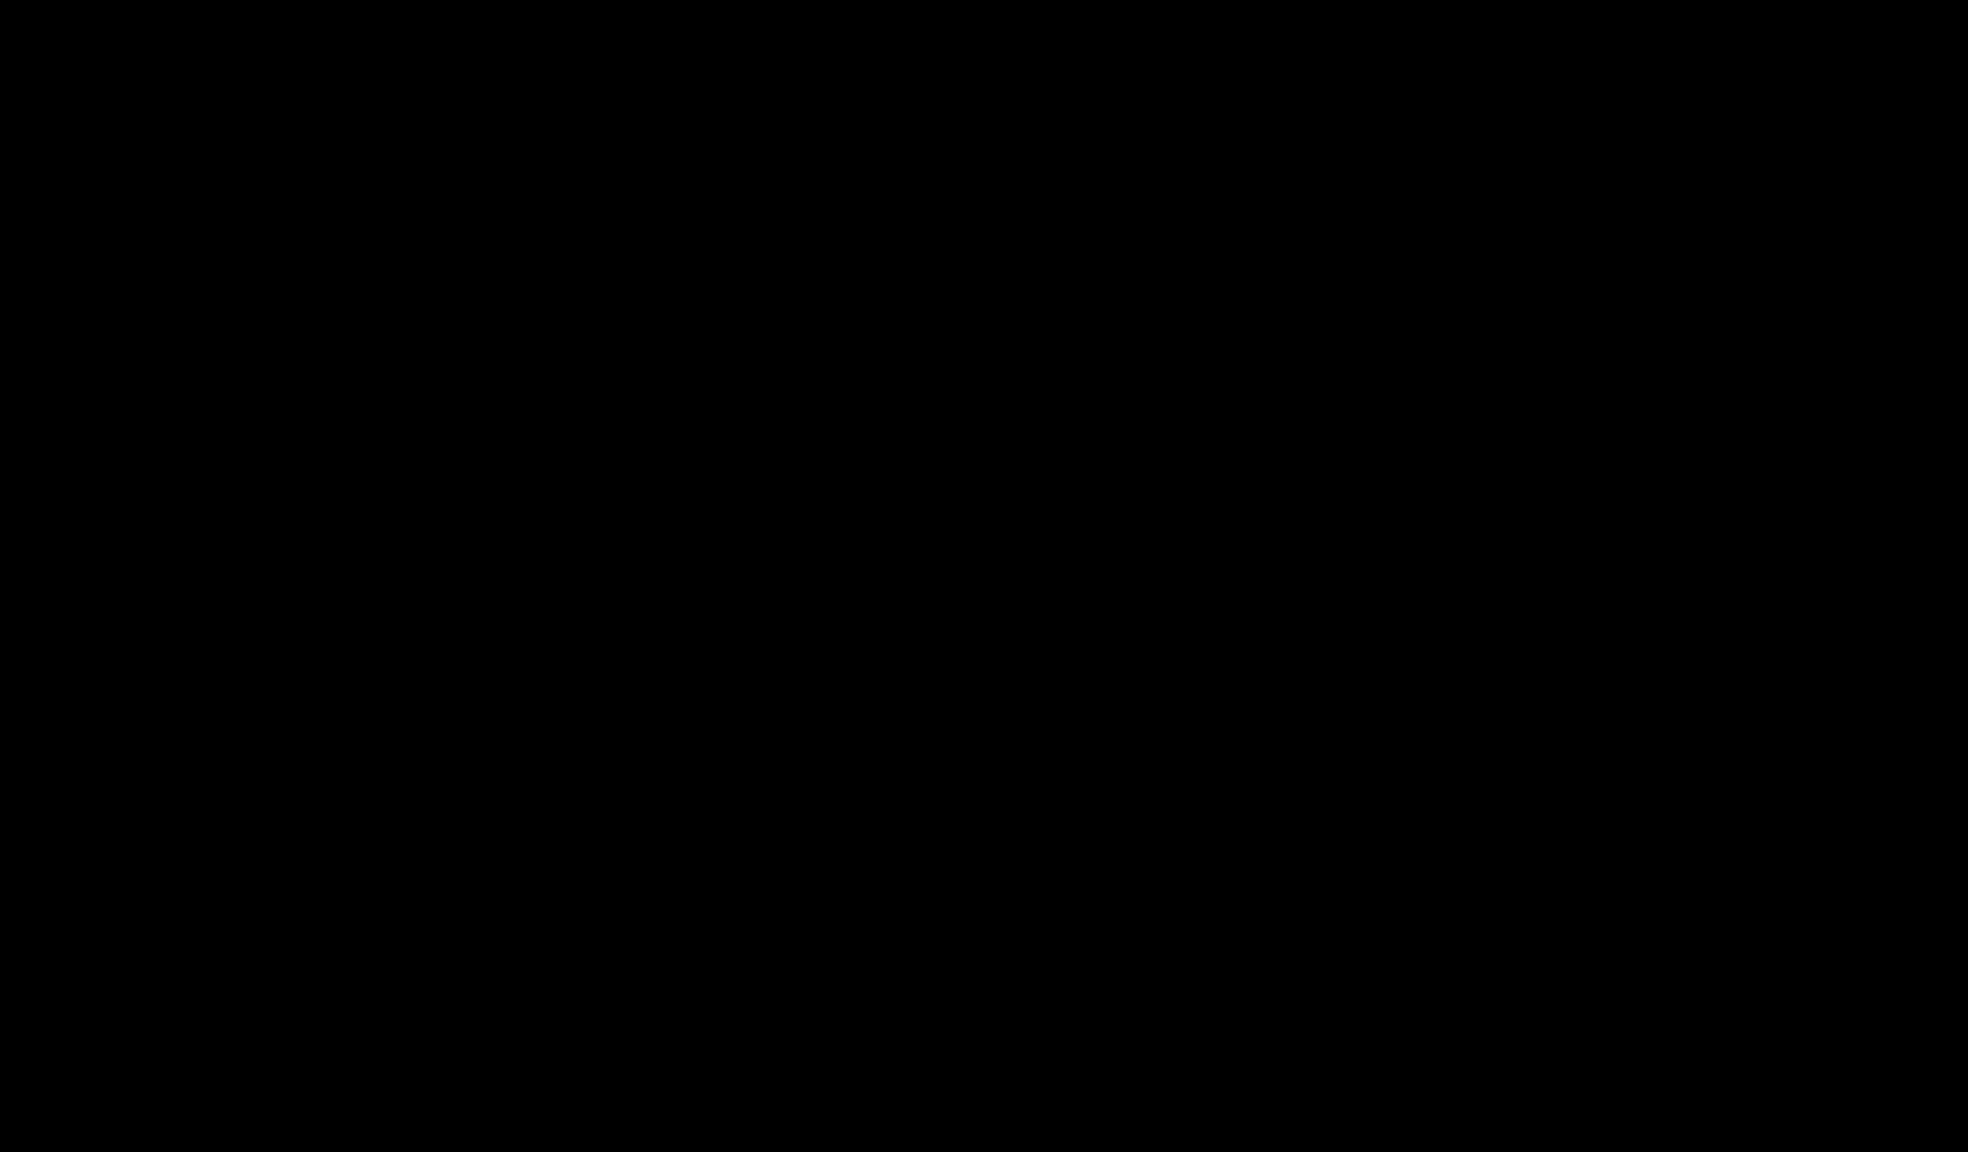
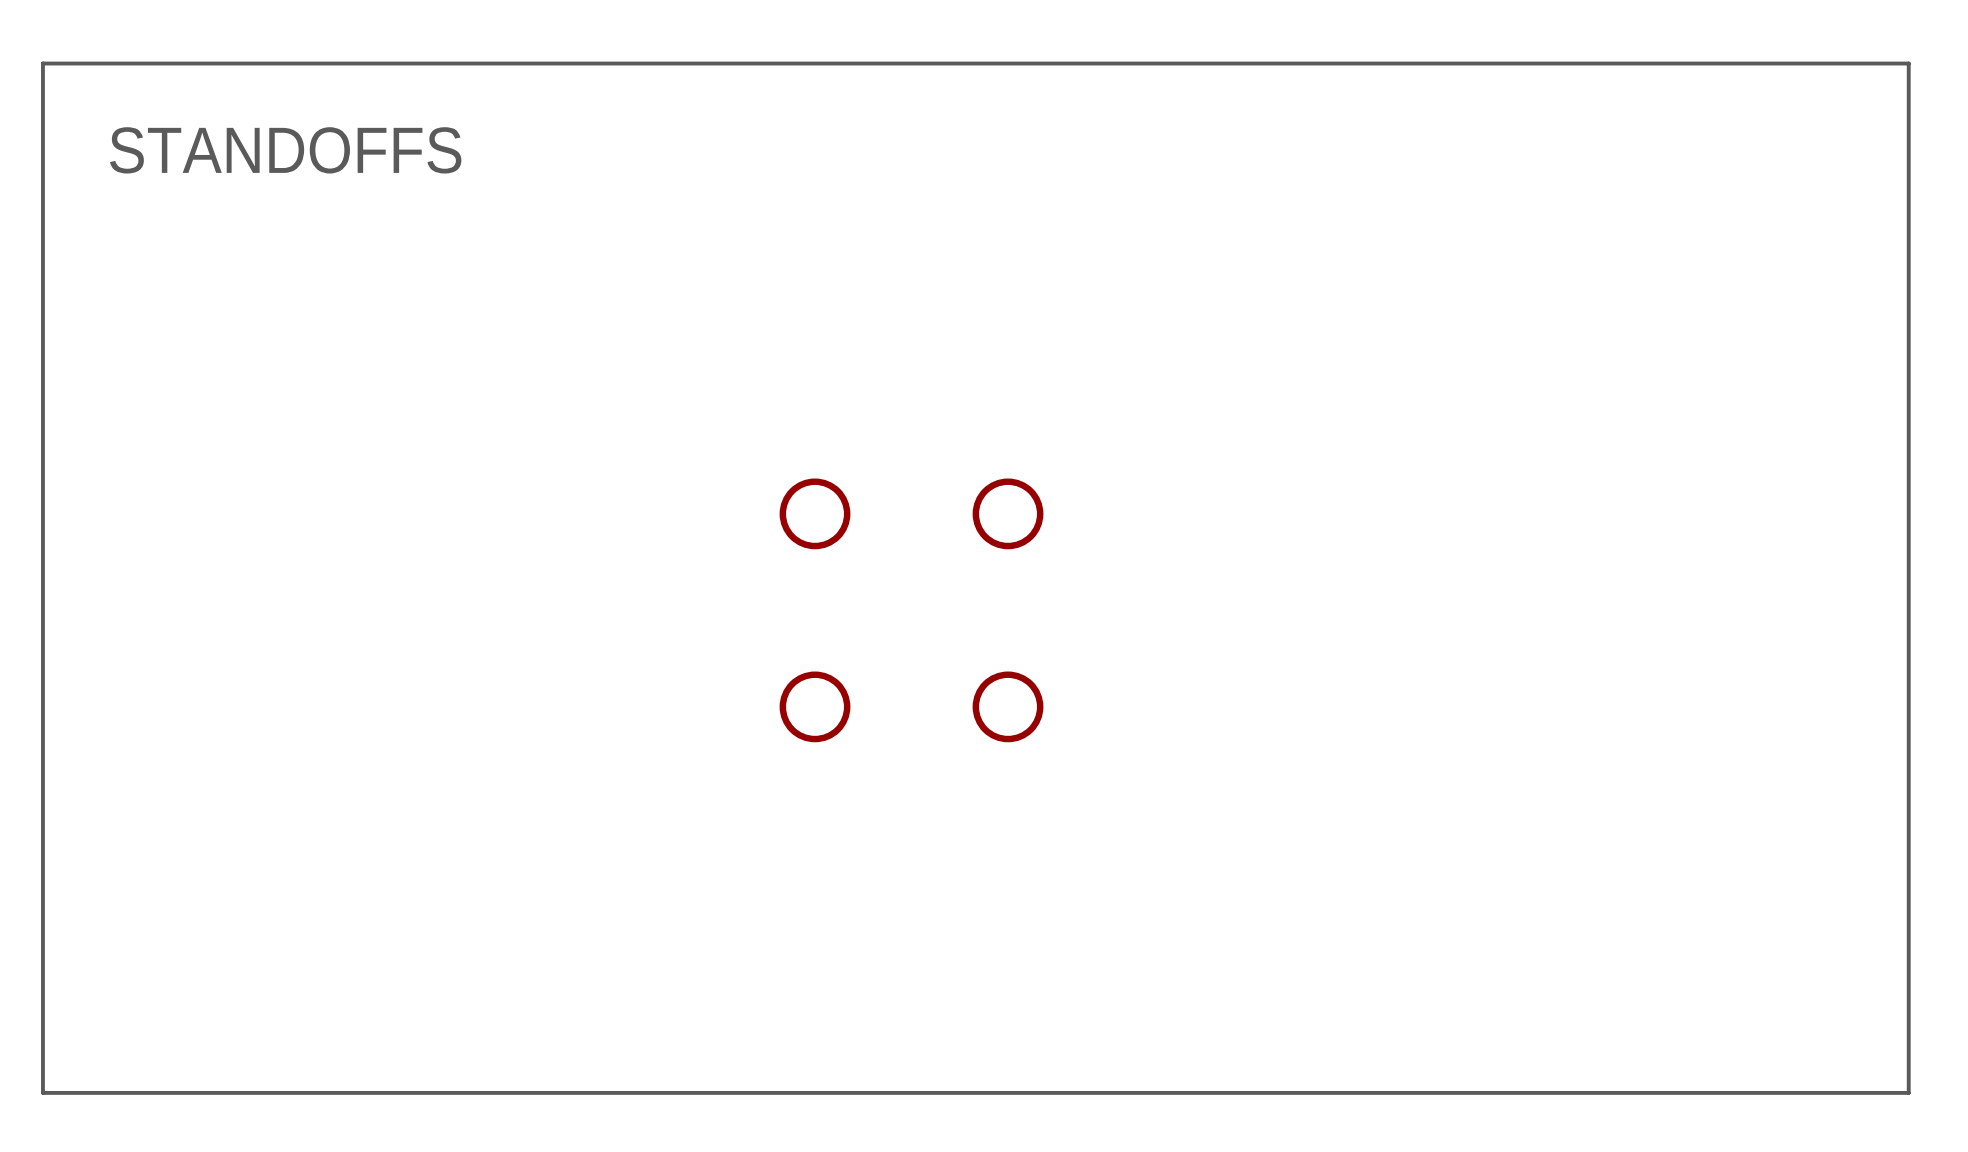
line: none -> (42, 63) (1908, 63) (1908, 1092) (42, 1092) (42, 63)
text: none -> STANDOFFS (285, 150)
part: none -> (815, 513)
part: none -> (1008, 513)
part: none -> (815, 706)
part: none -> (1008, 706)

